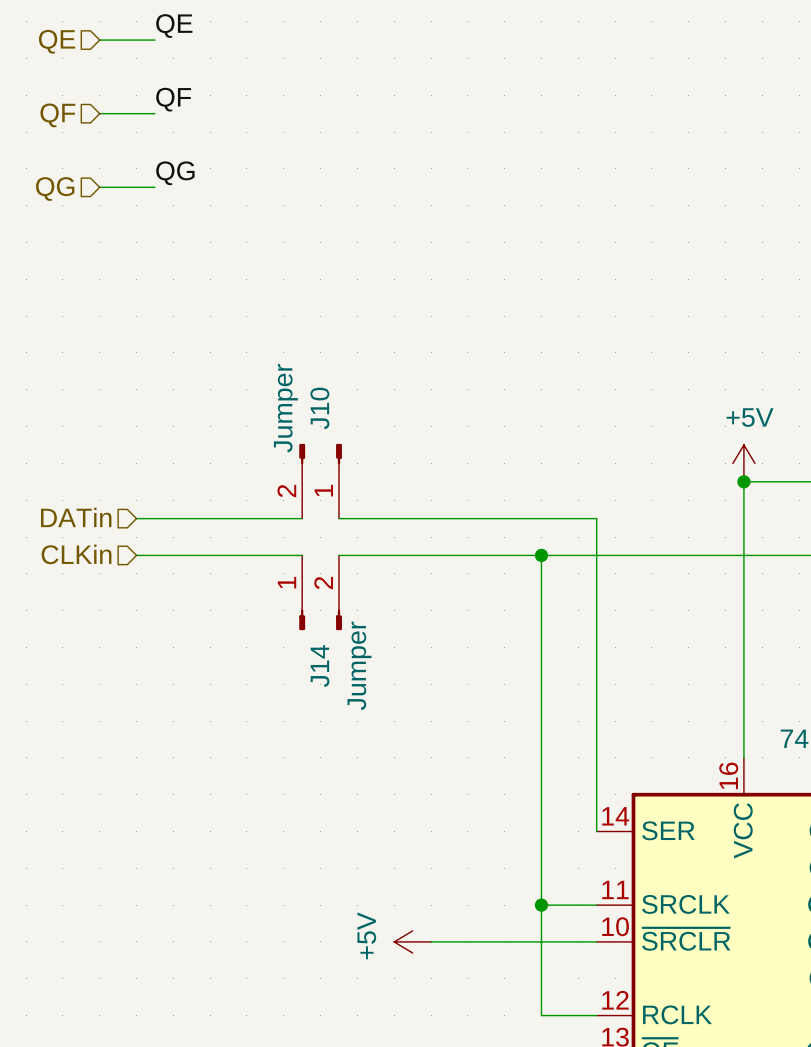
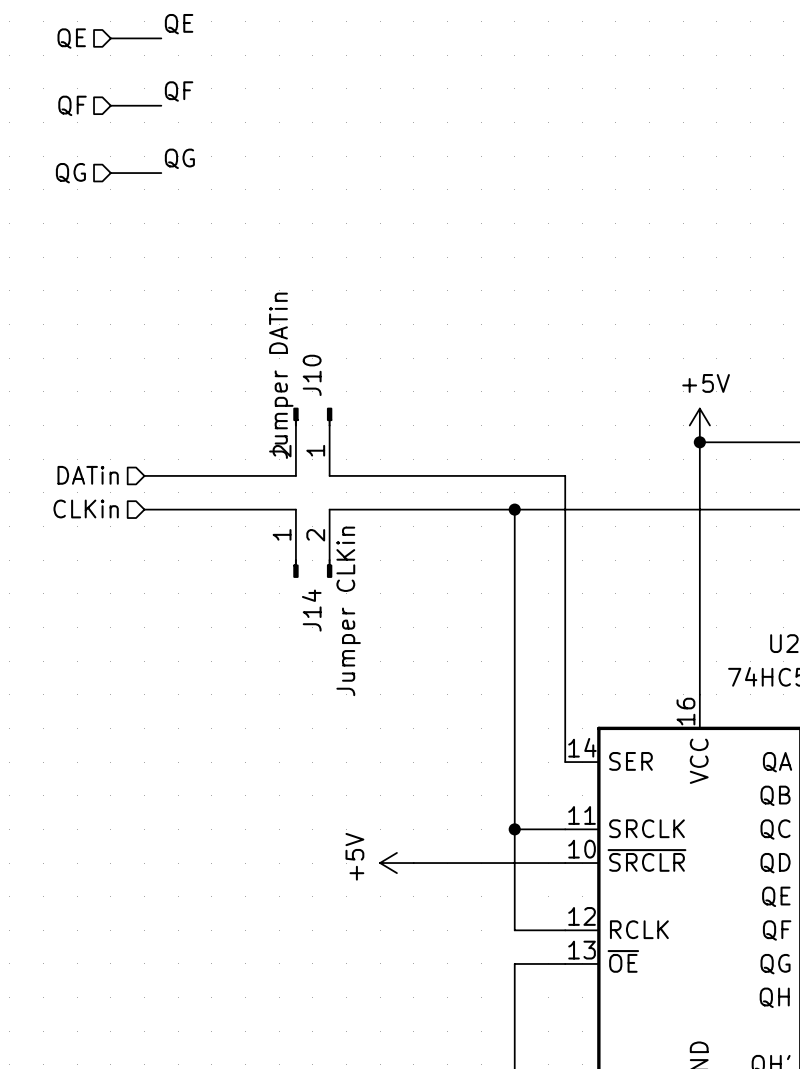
J10 value: Jumper (285, 408) -> Jumper DATin (281, 375)
J14 value: Jumper (359, 665) -> Jumper CLKin (348, 611)

